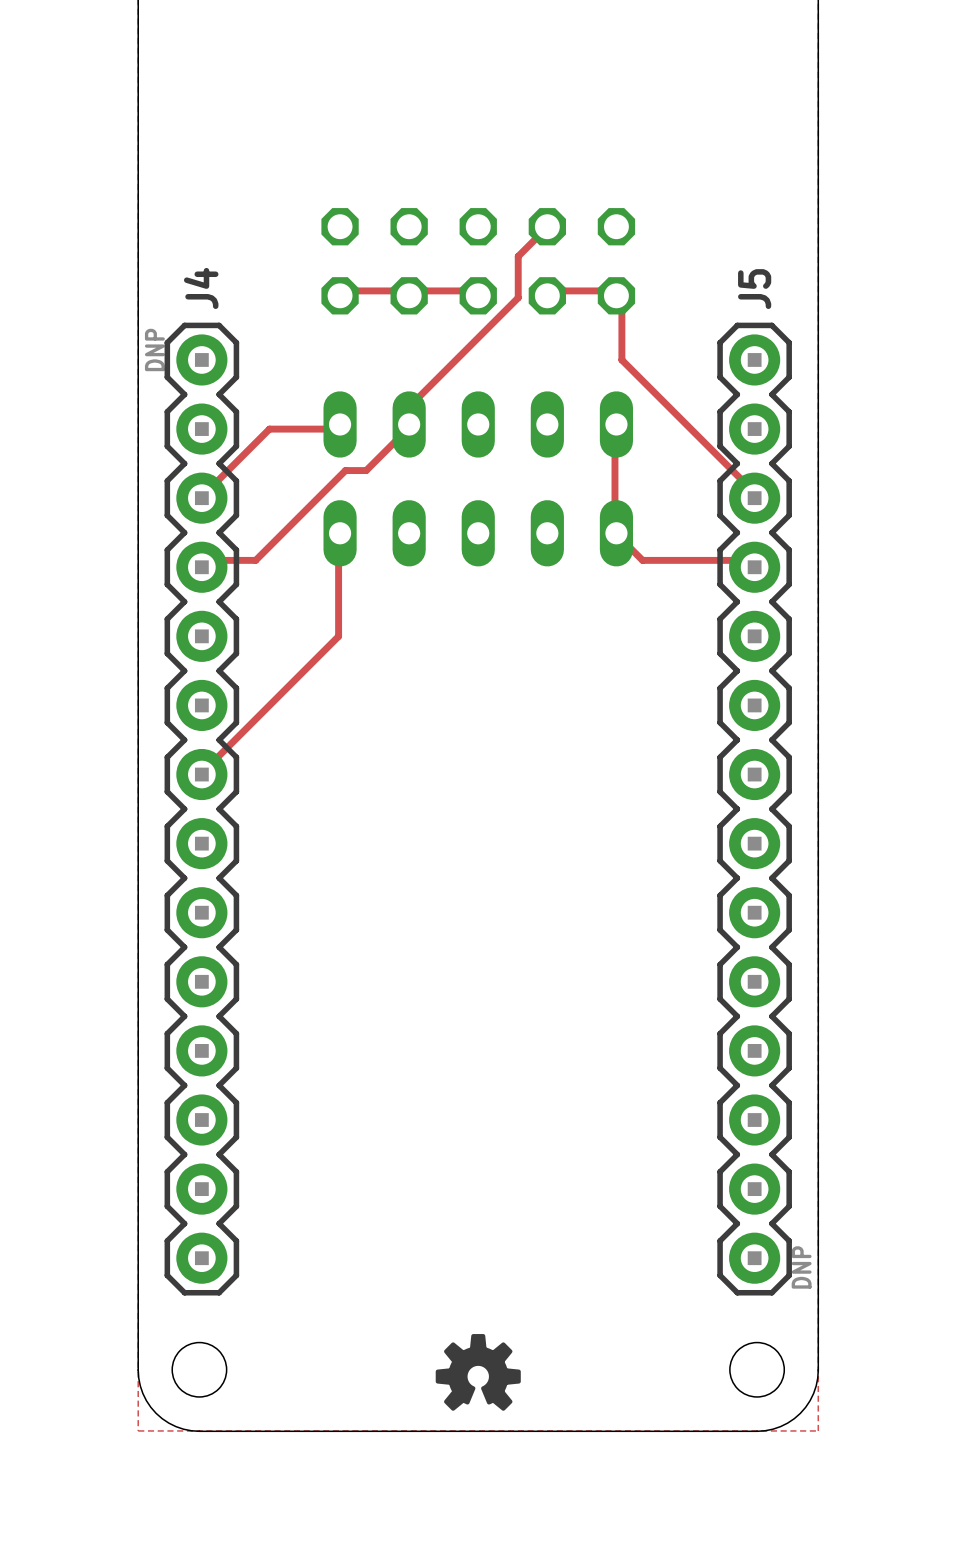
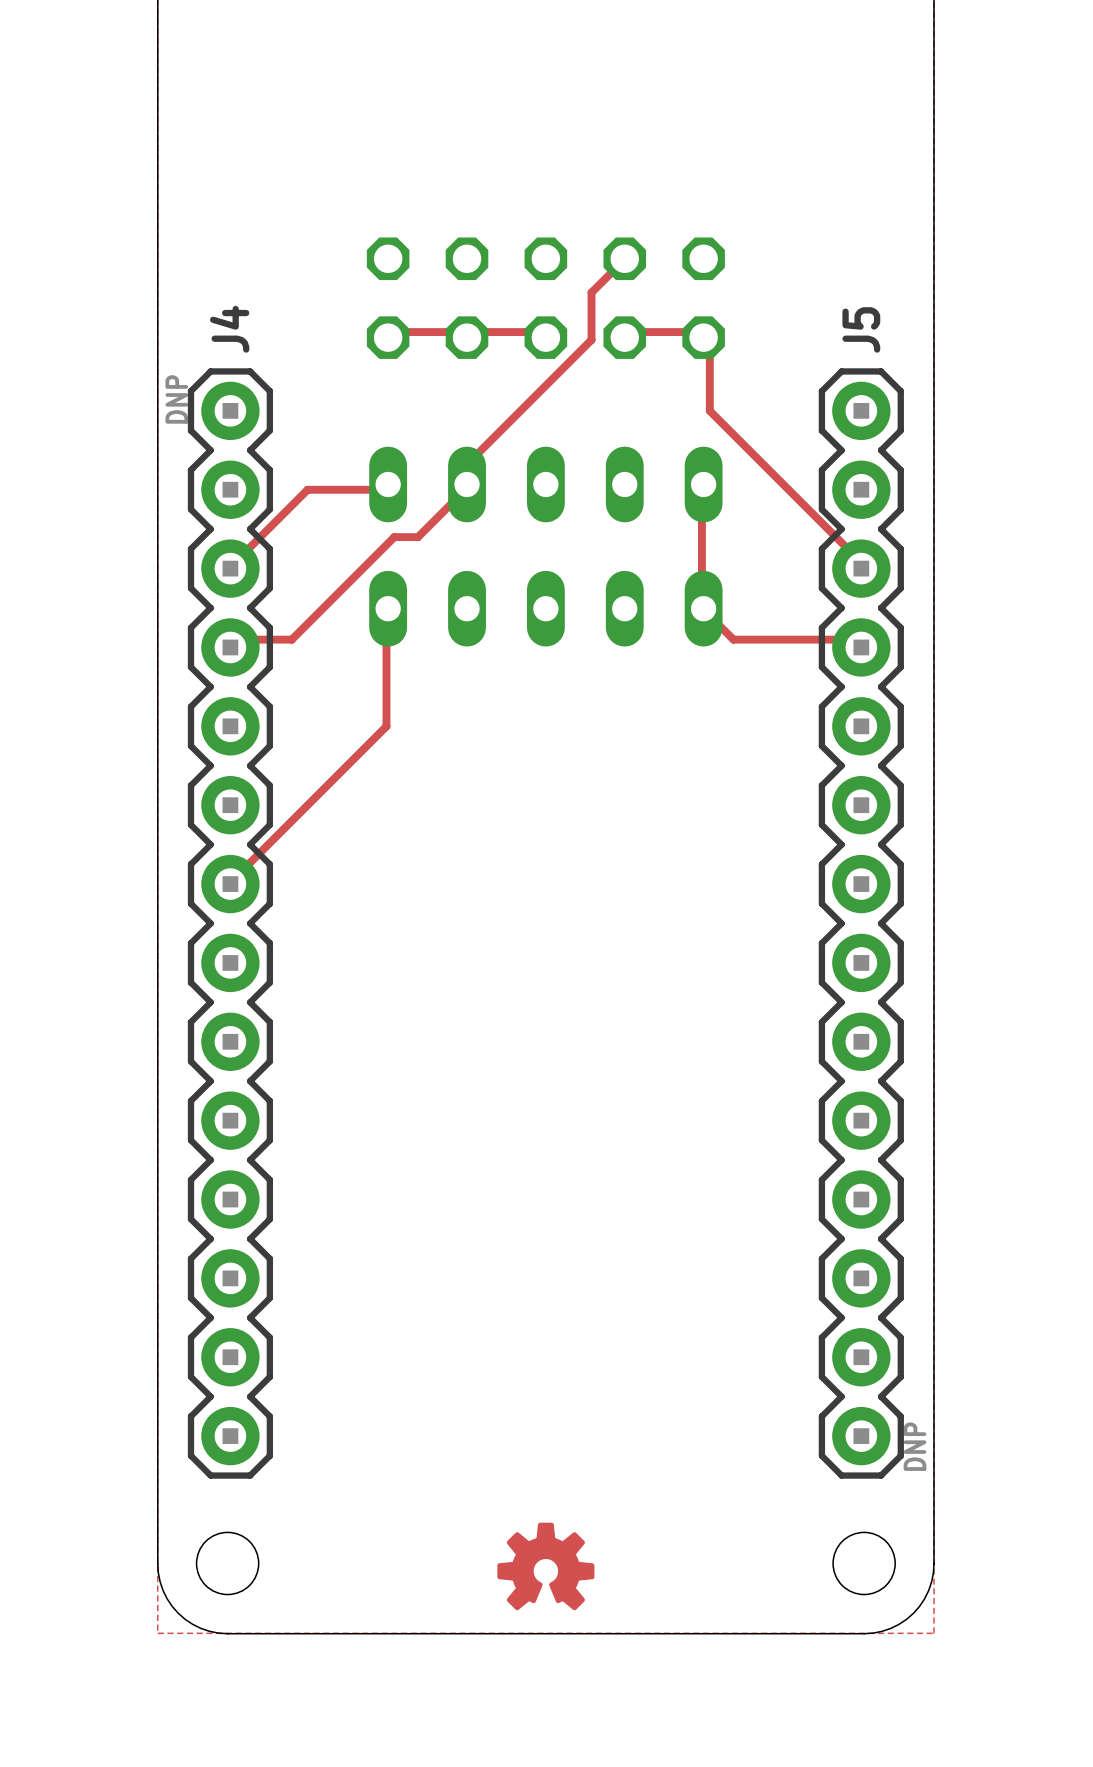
drawing shape: [435, 1334, 521, 1411] -> [497, 1522, 595, 1611]

